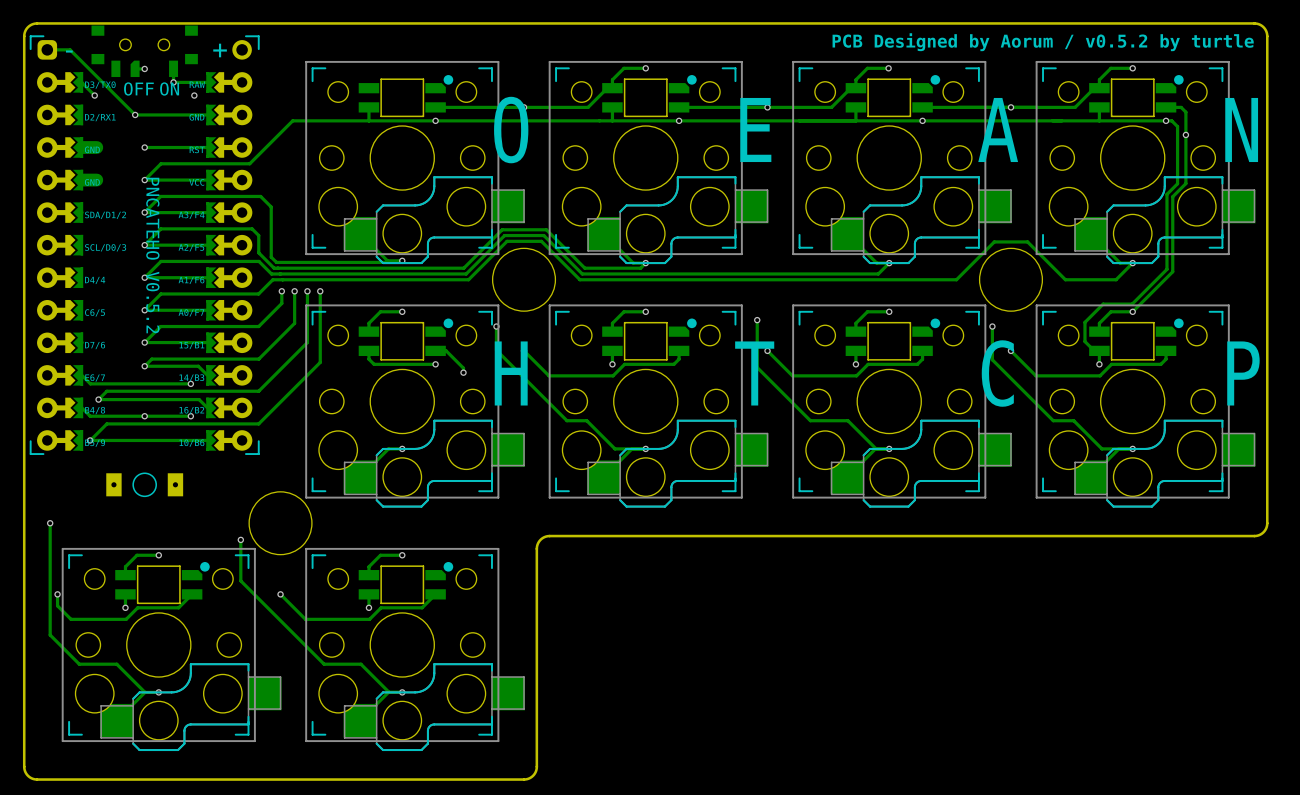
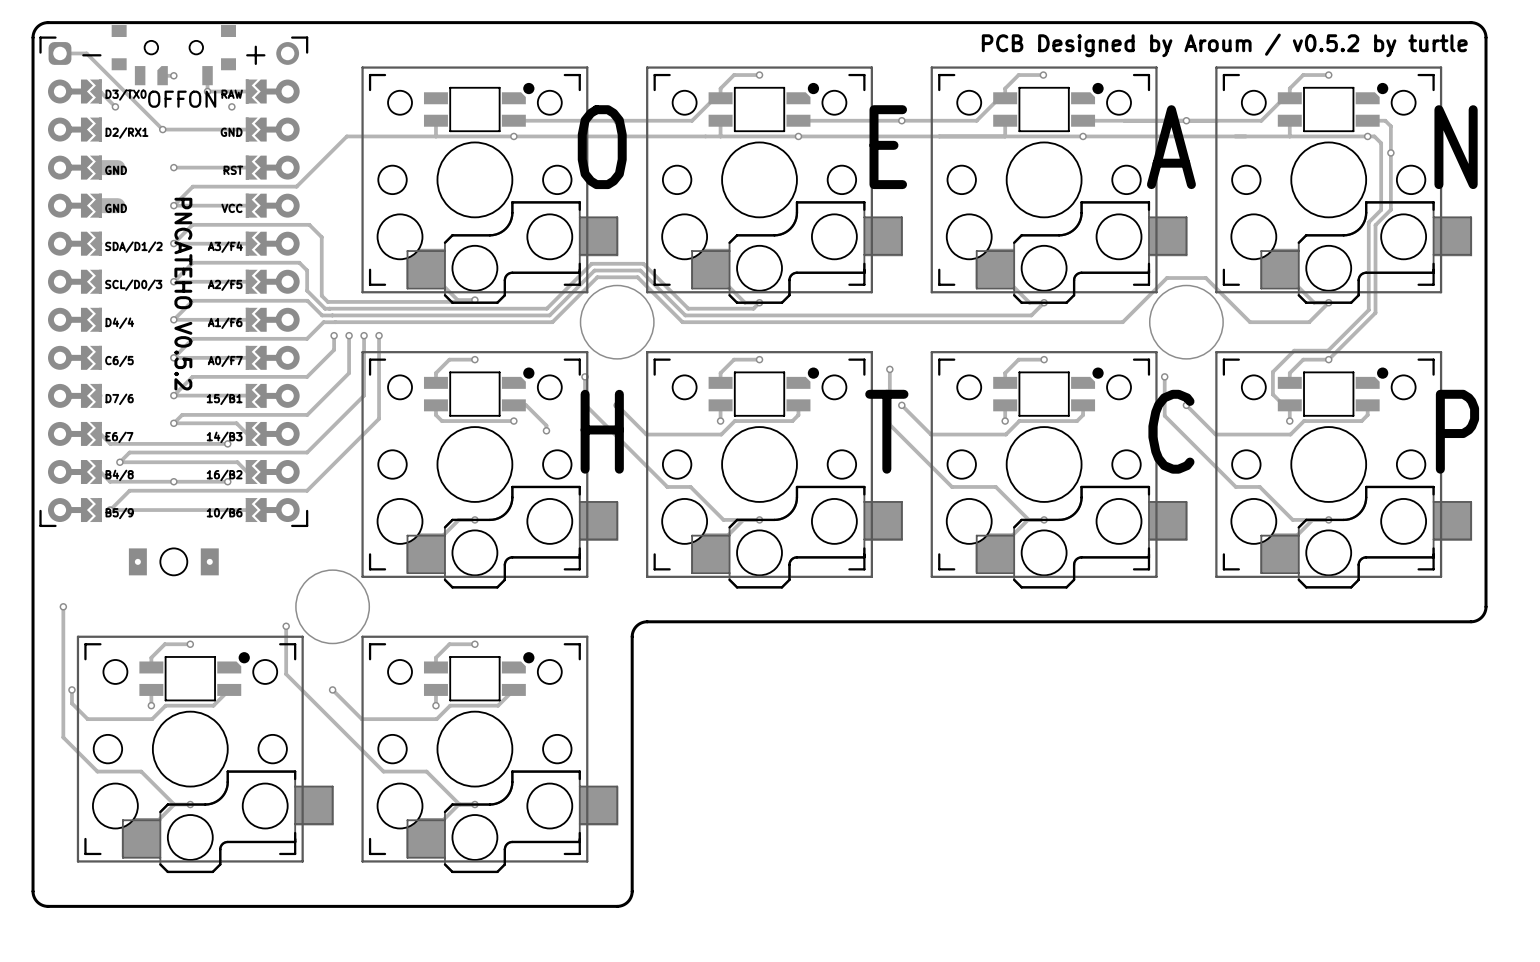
text: PCB Designed by Aorum / v0.5.2 by turtle (1043, 42) -> PCB Designed by Aroum / v0.5.2 by turtle (1224, 45)

